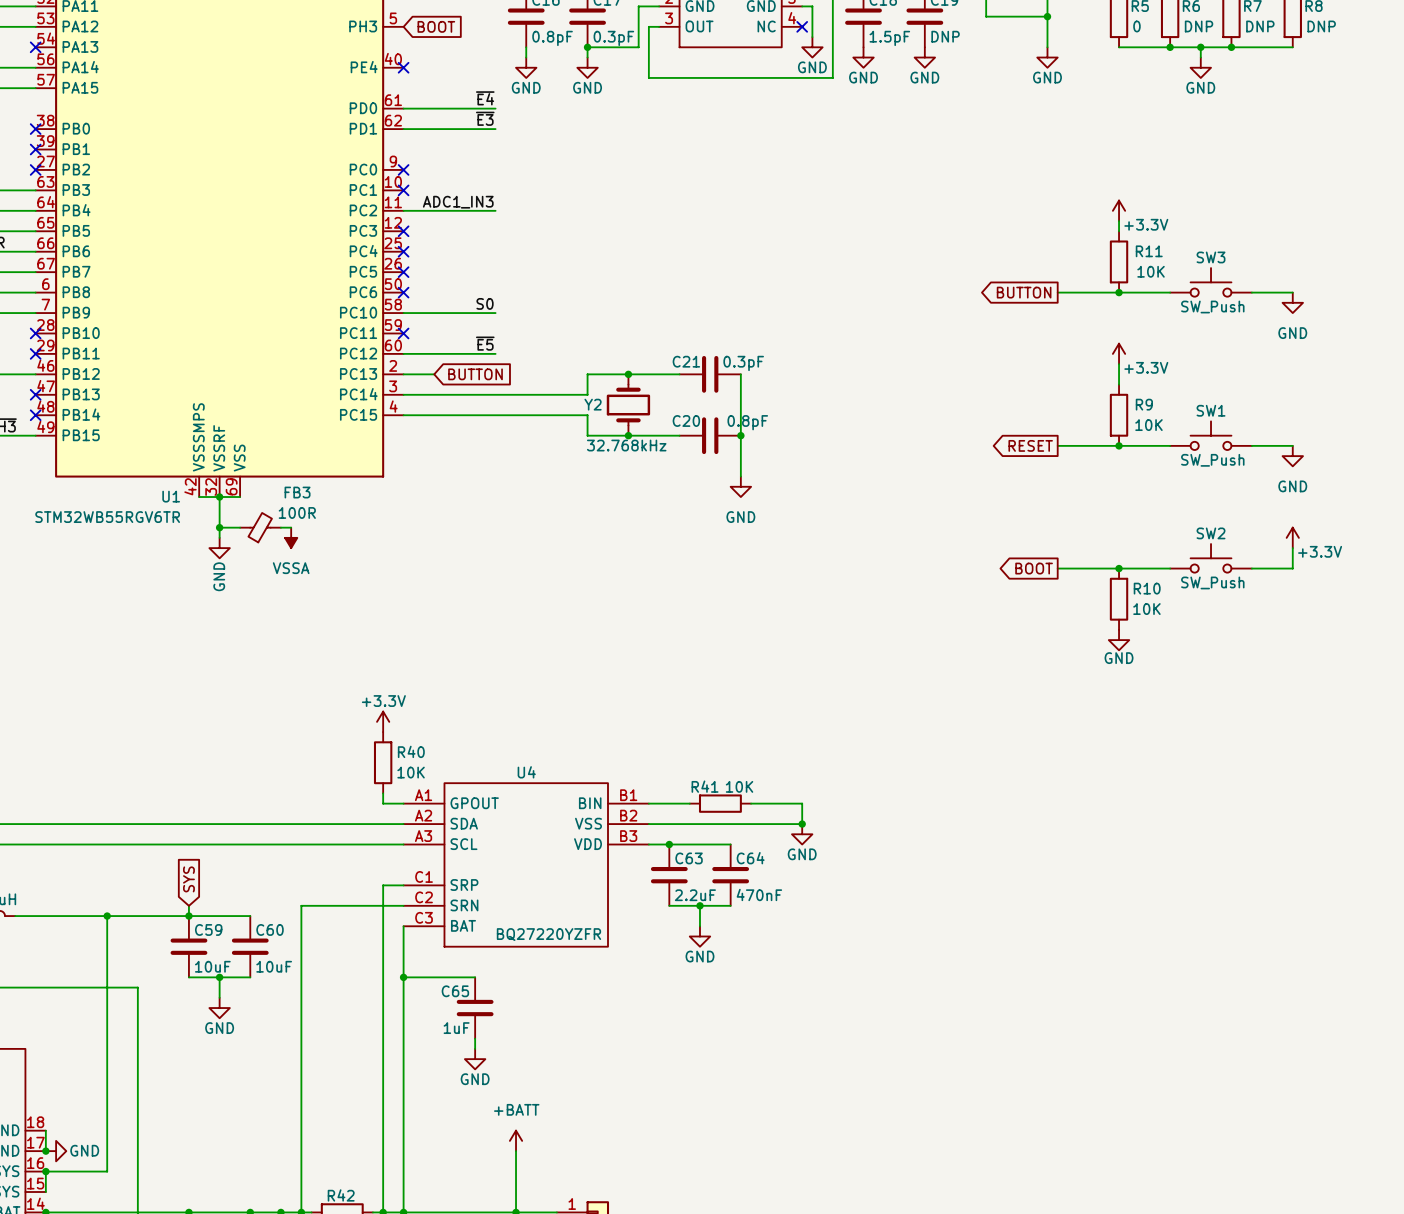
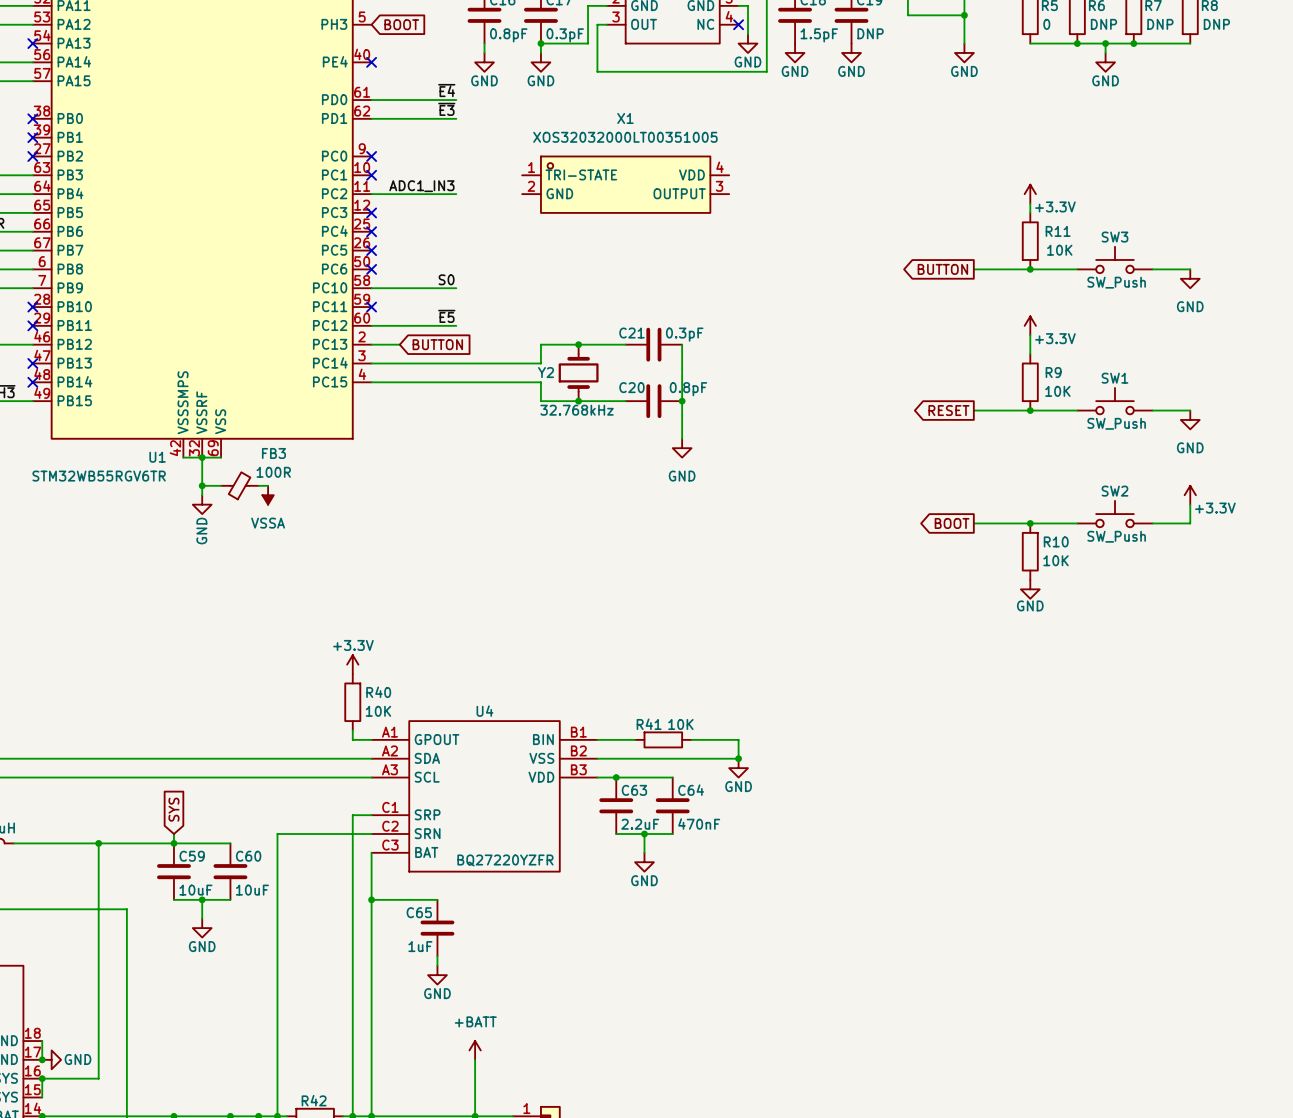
X1: none -> XOS32032000LT00351005 (625, 184)

